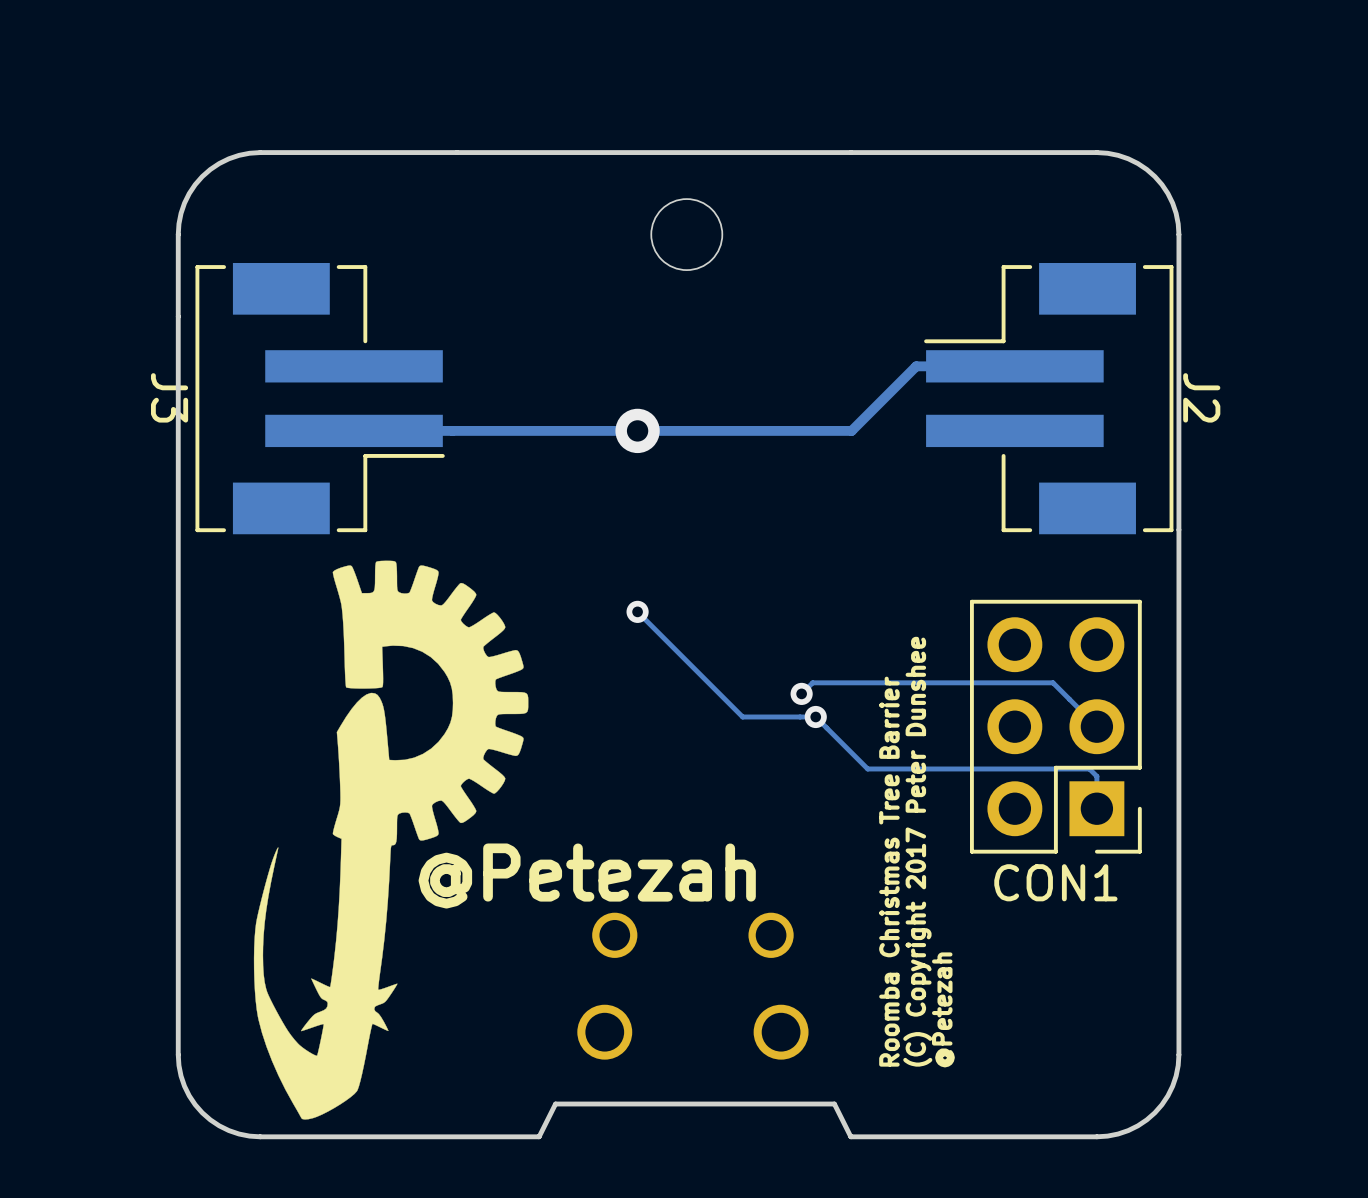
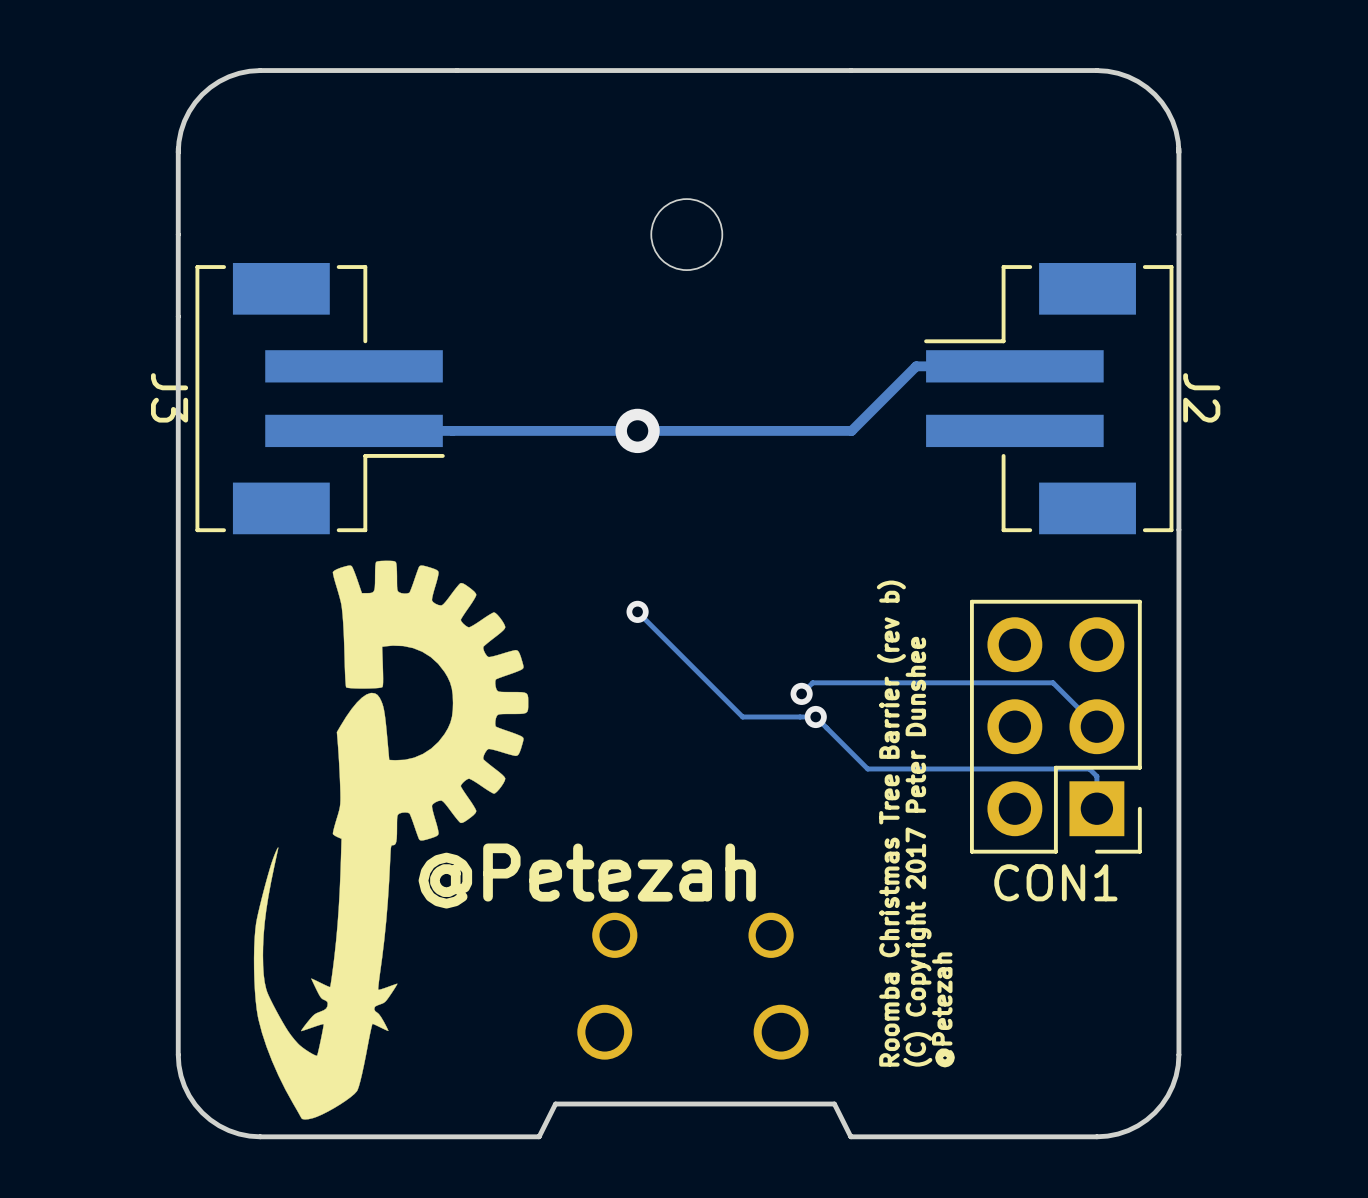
board edge: none -> (178, 148) (178, 234)
board edge: none -> (1178, 152) (1176, 131) (1161, 102) (1137, 81) (1107, 71) (260, 70) (228, 76) (202, 94) (184, 121) (178, 152)
board edge: (1178, 234) (1176, 213) (1161, 184) (1137, 163) (1107, 153) (260, 152) (228, 158) (202, 176) (184, 203) (178, 234) -> (1178, 234) (1178, 148)
text: Roomba Christmas Tree Barrier (889, 871) -> Roomba Christmas Tree Barrier (rev b) (891, 823)

